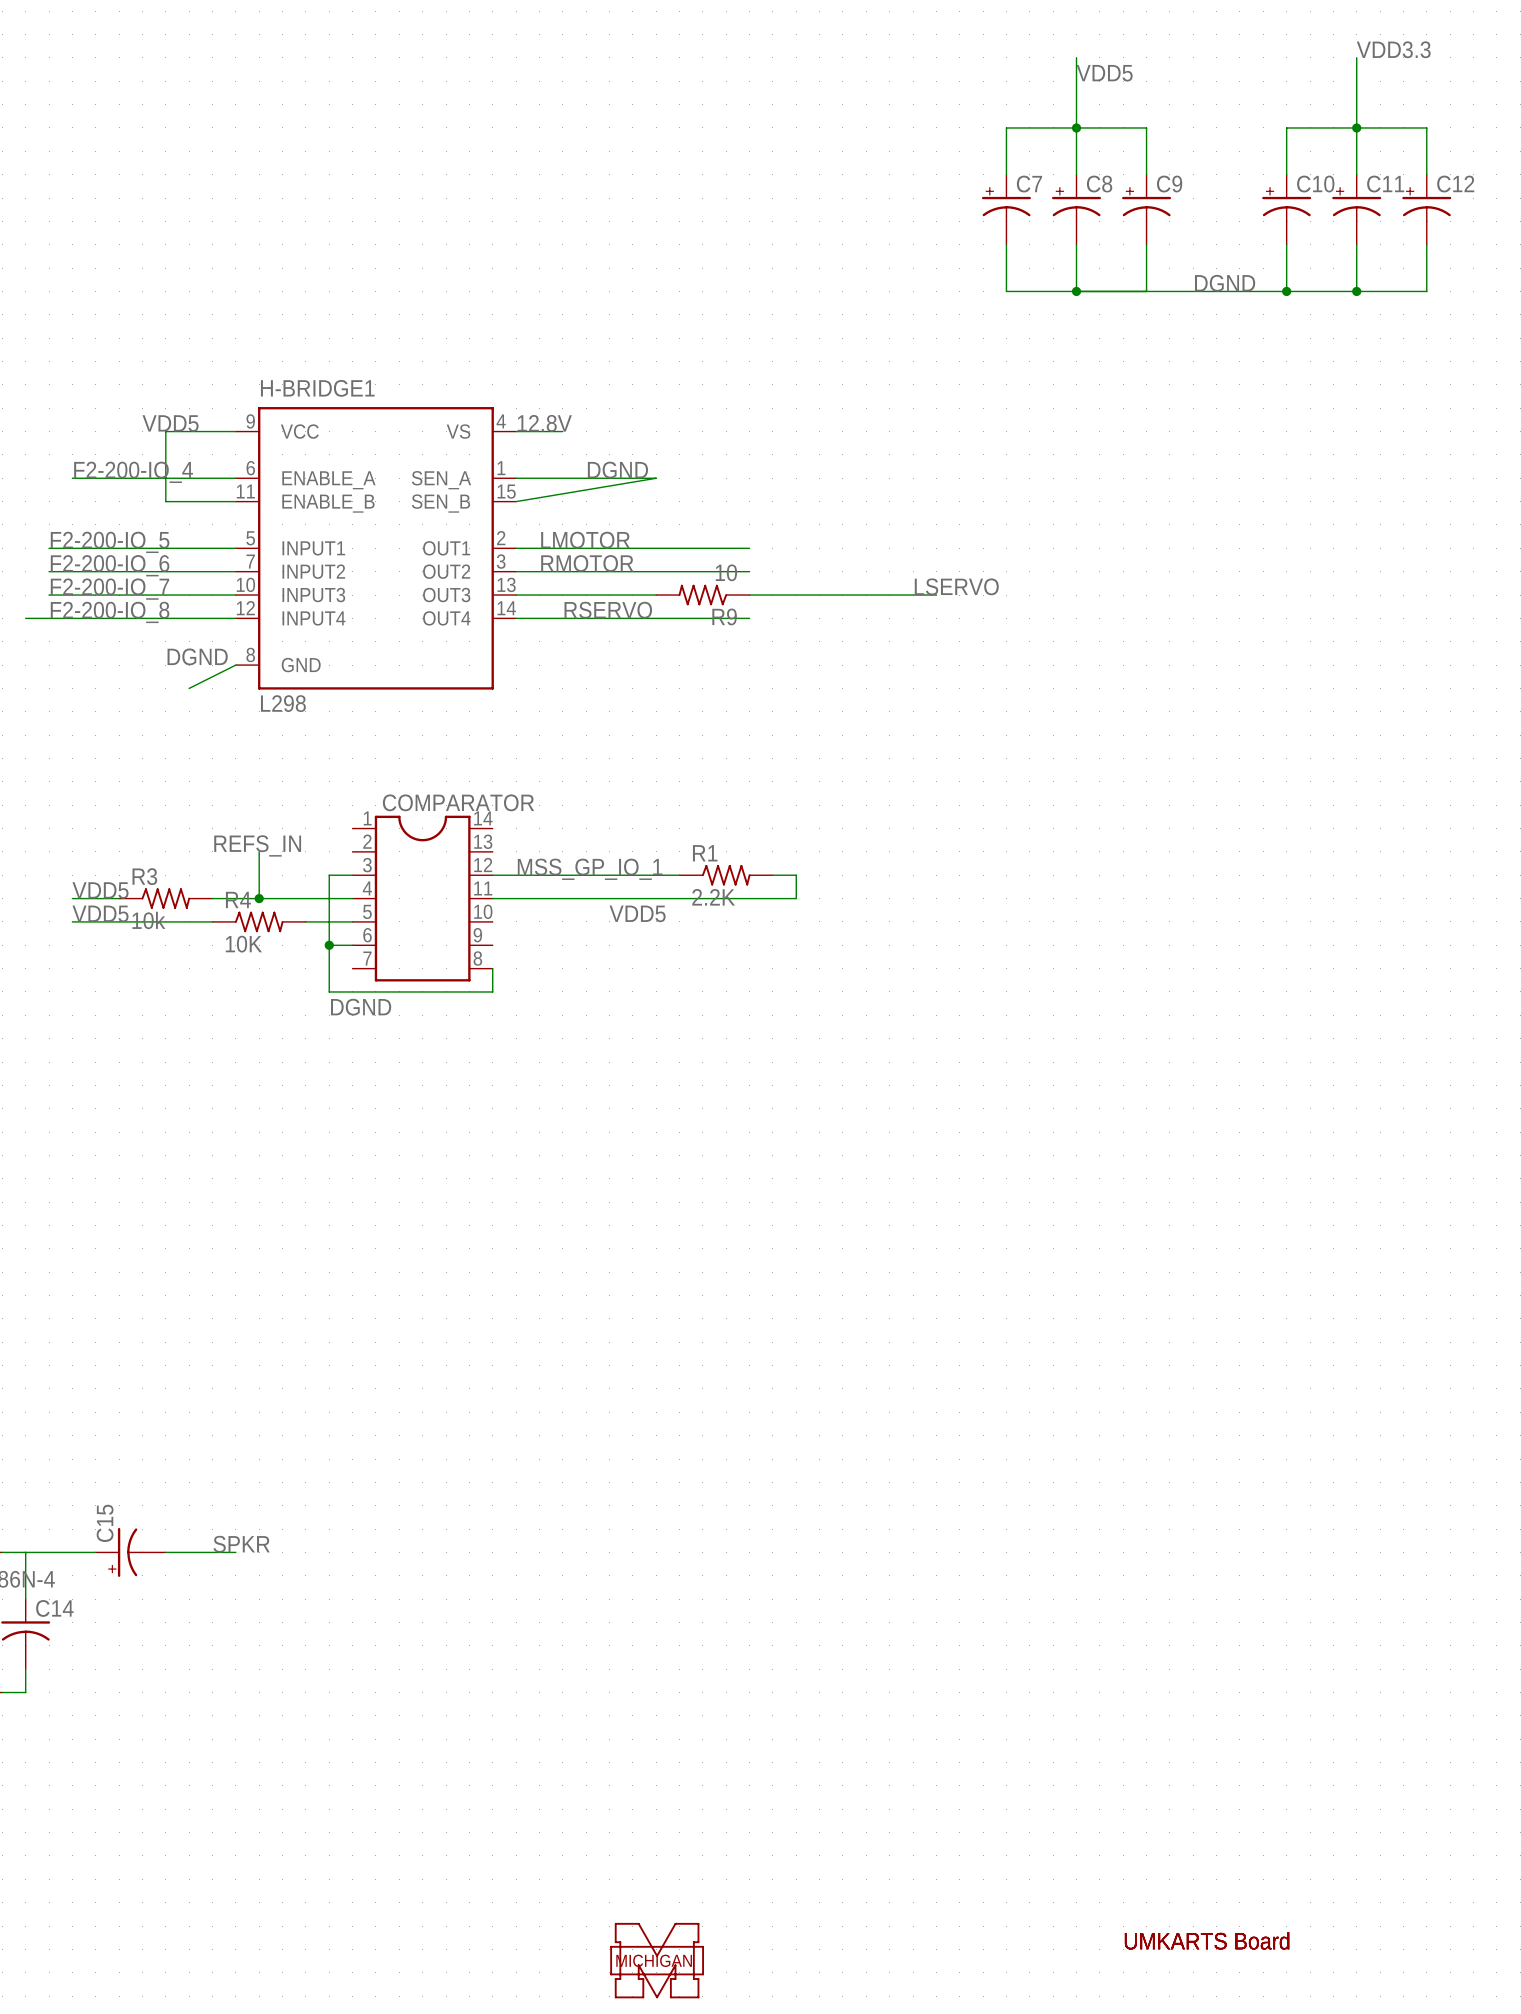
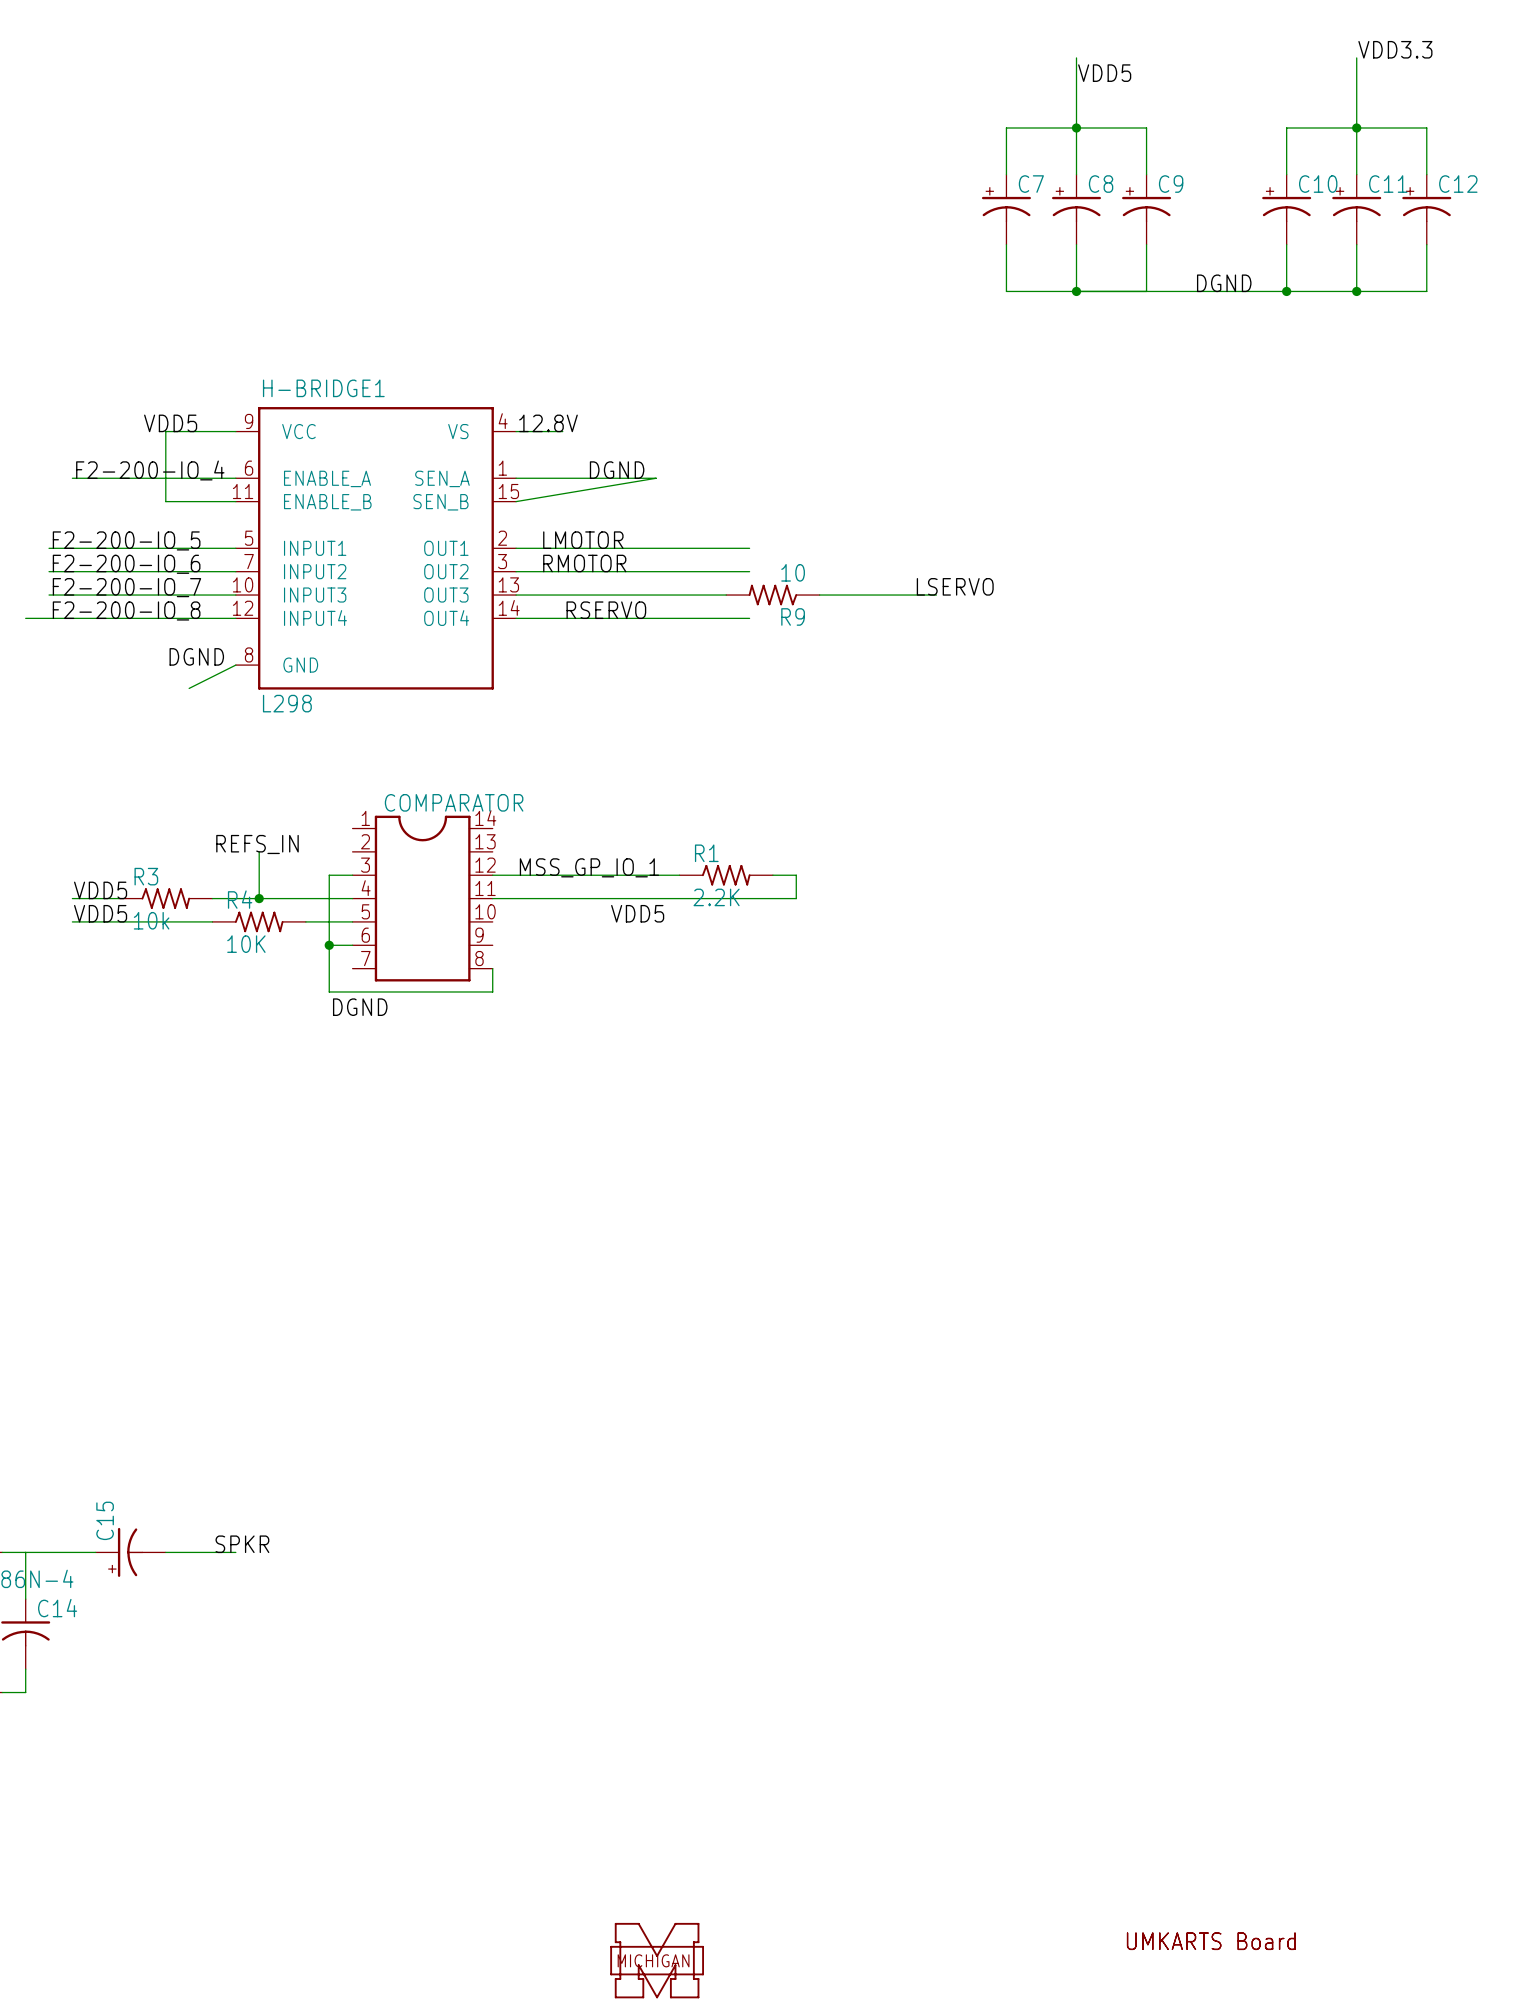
R9 position: (702, 595) -> (772, 595)

